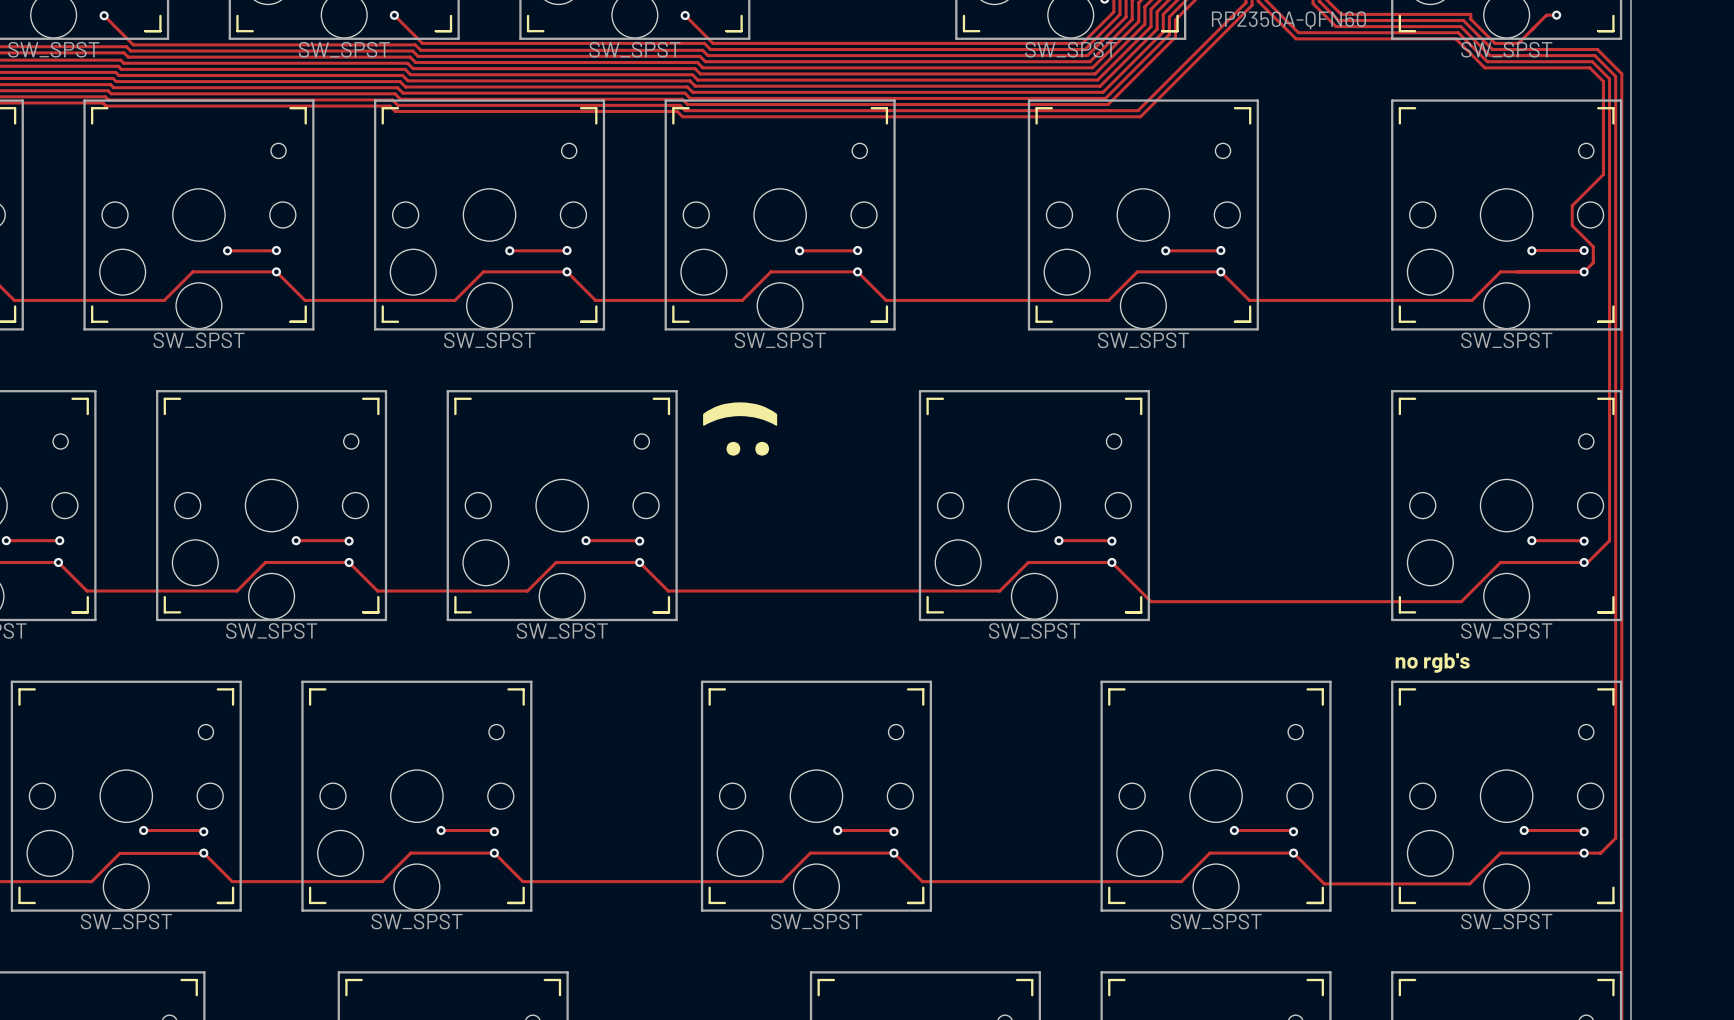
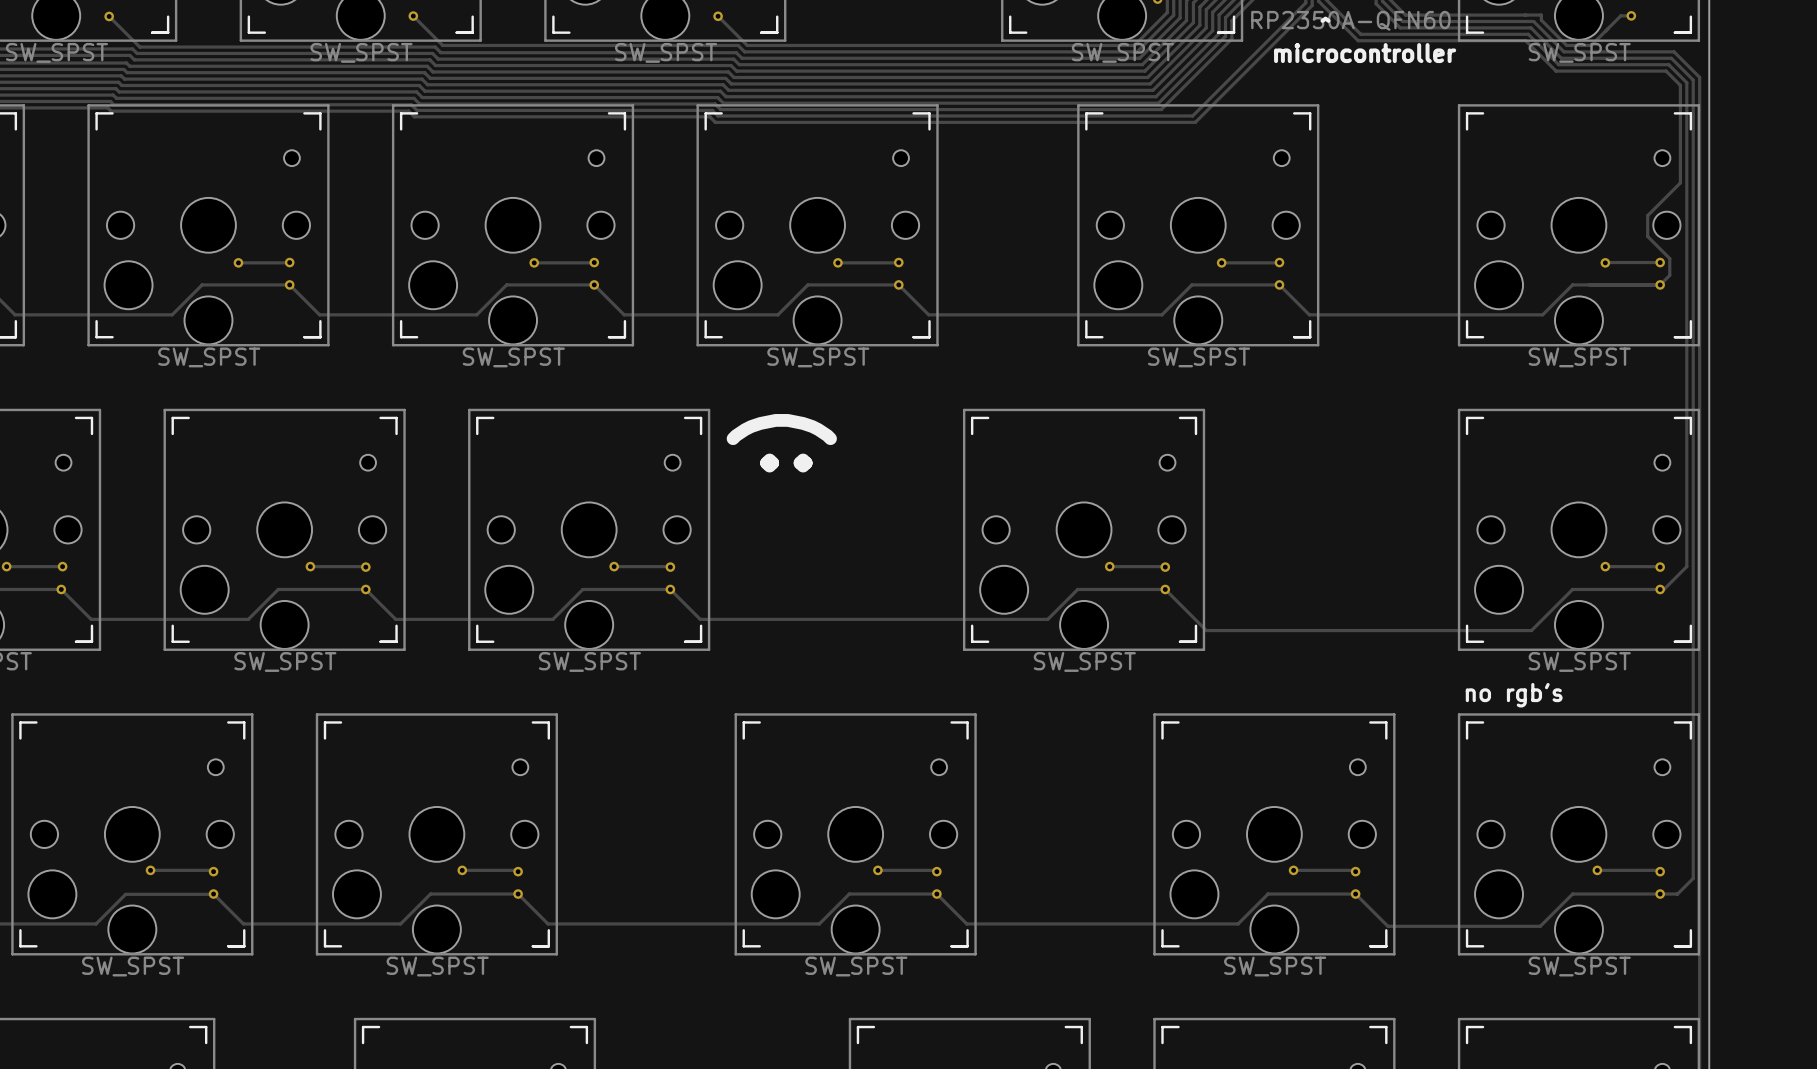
text: none -> ^ (1325, 19)
text: none -> microcontroller (1365, 53)

